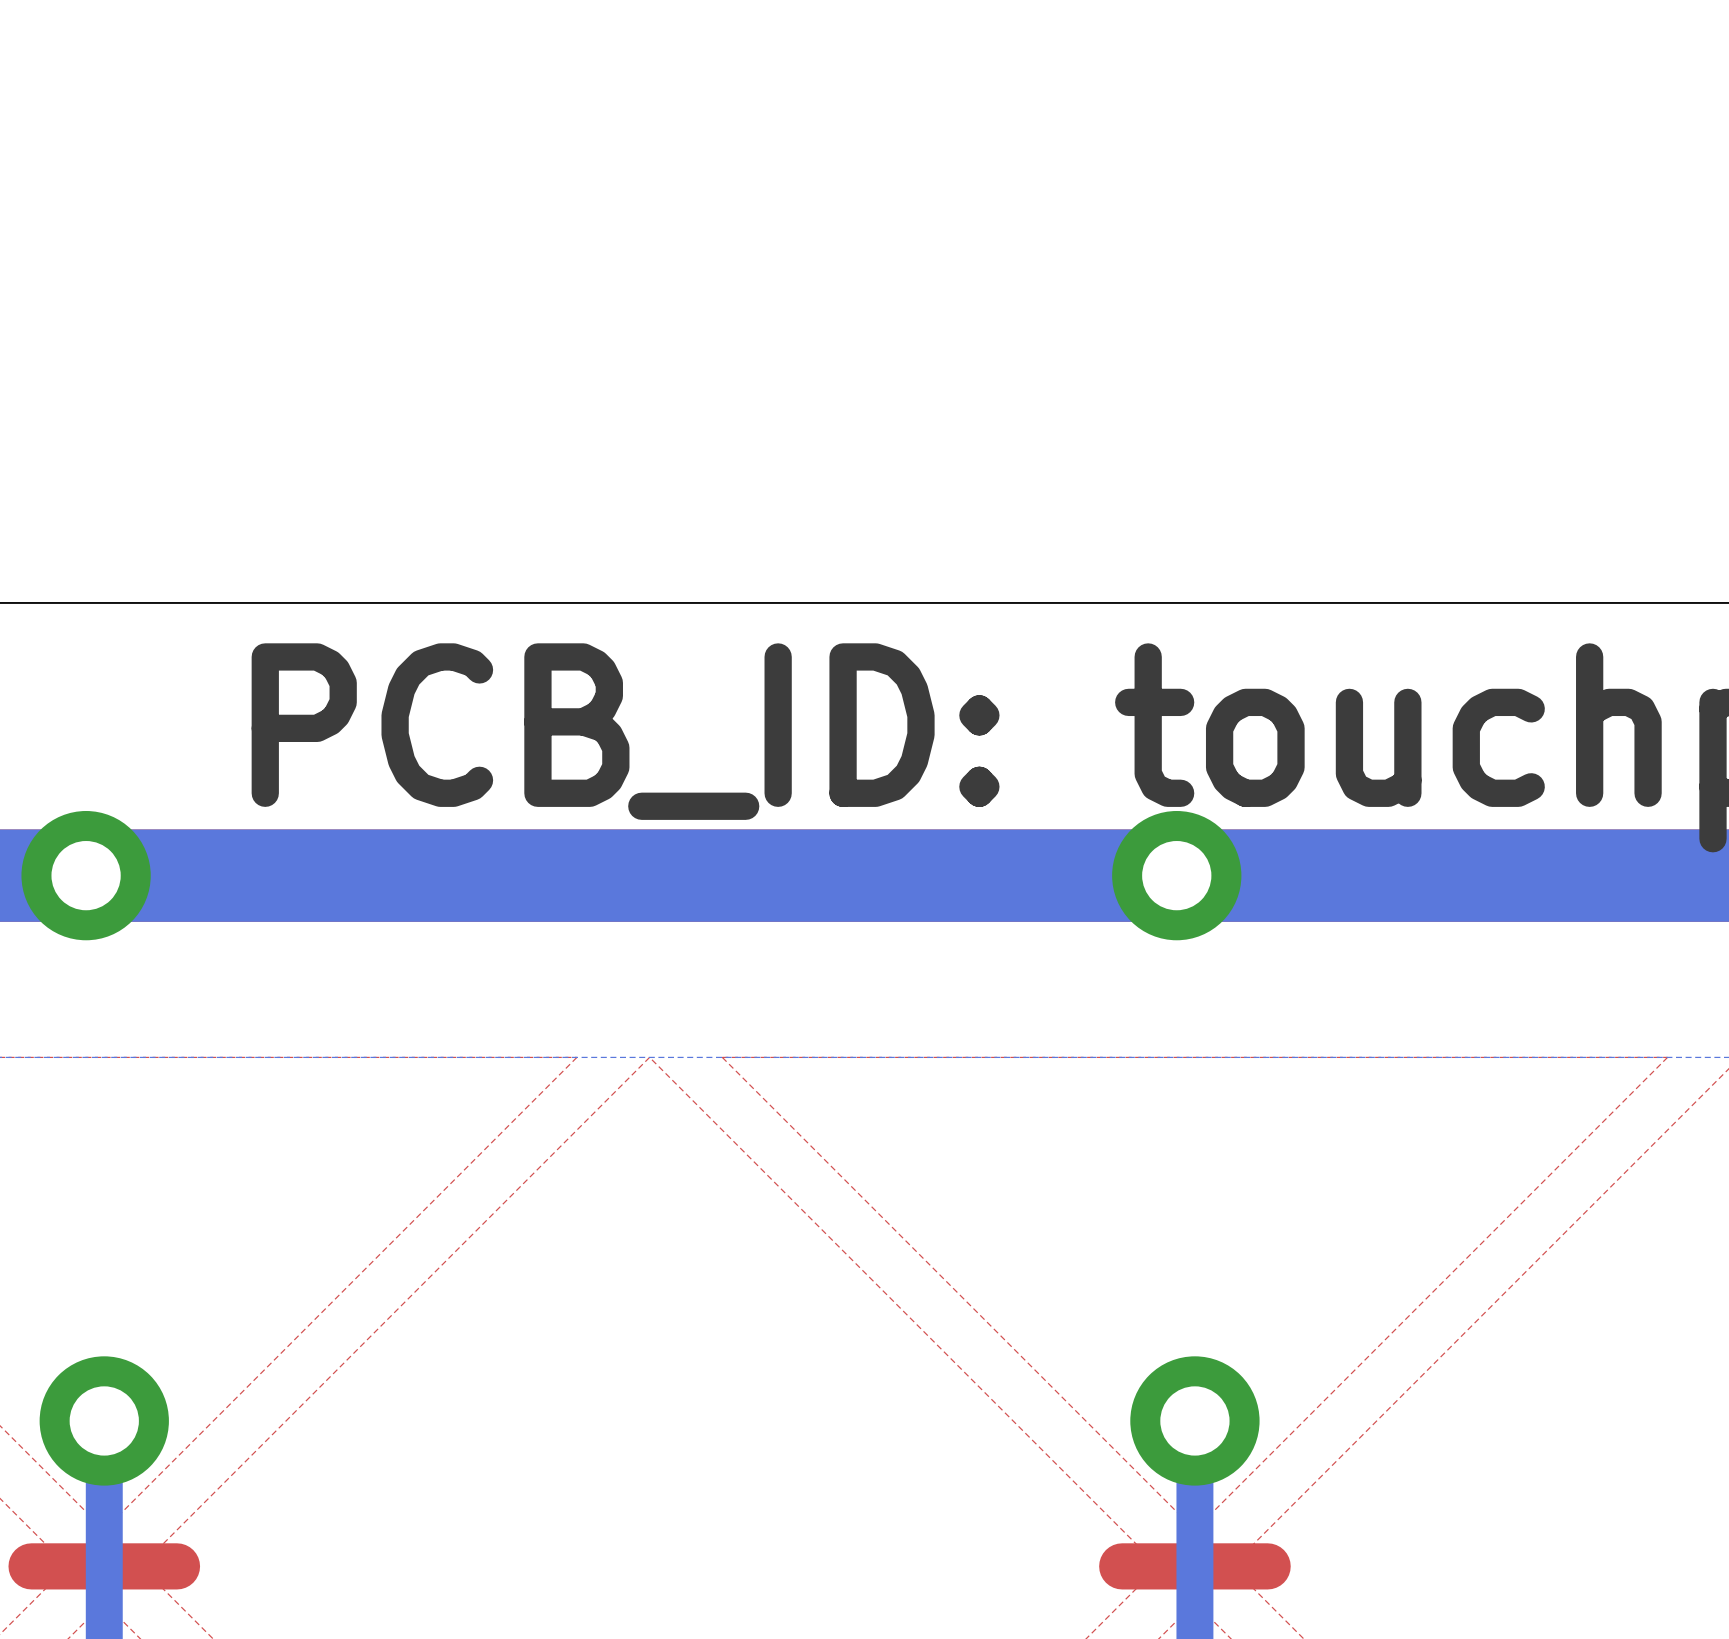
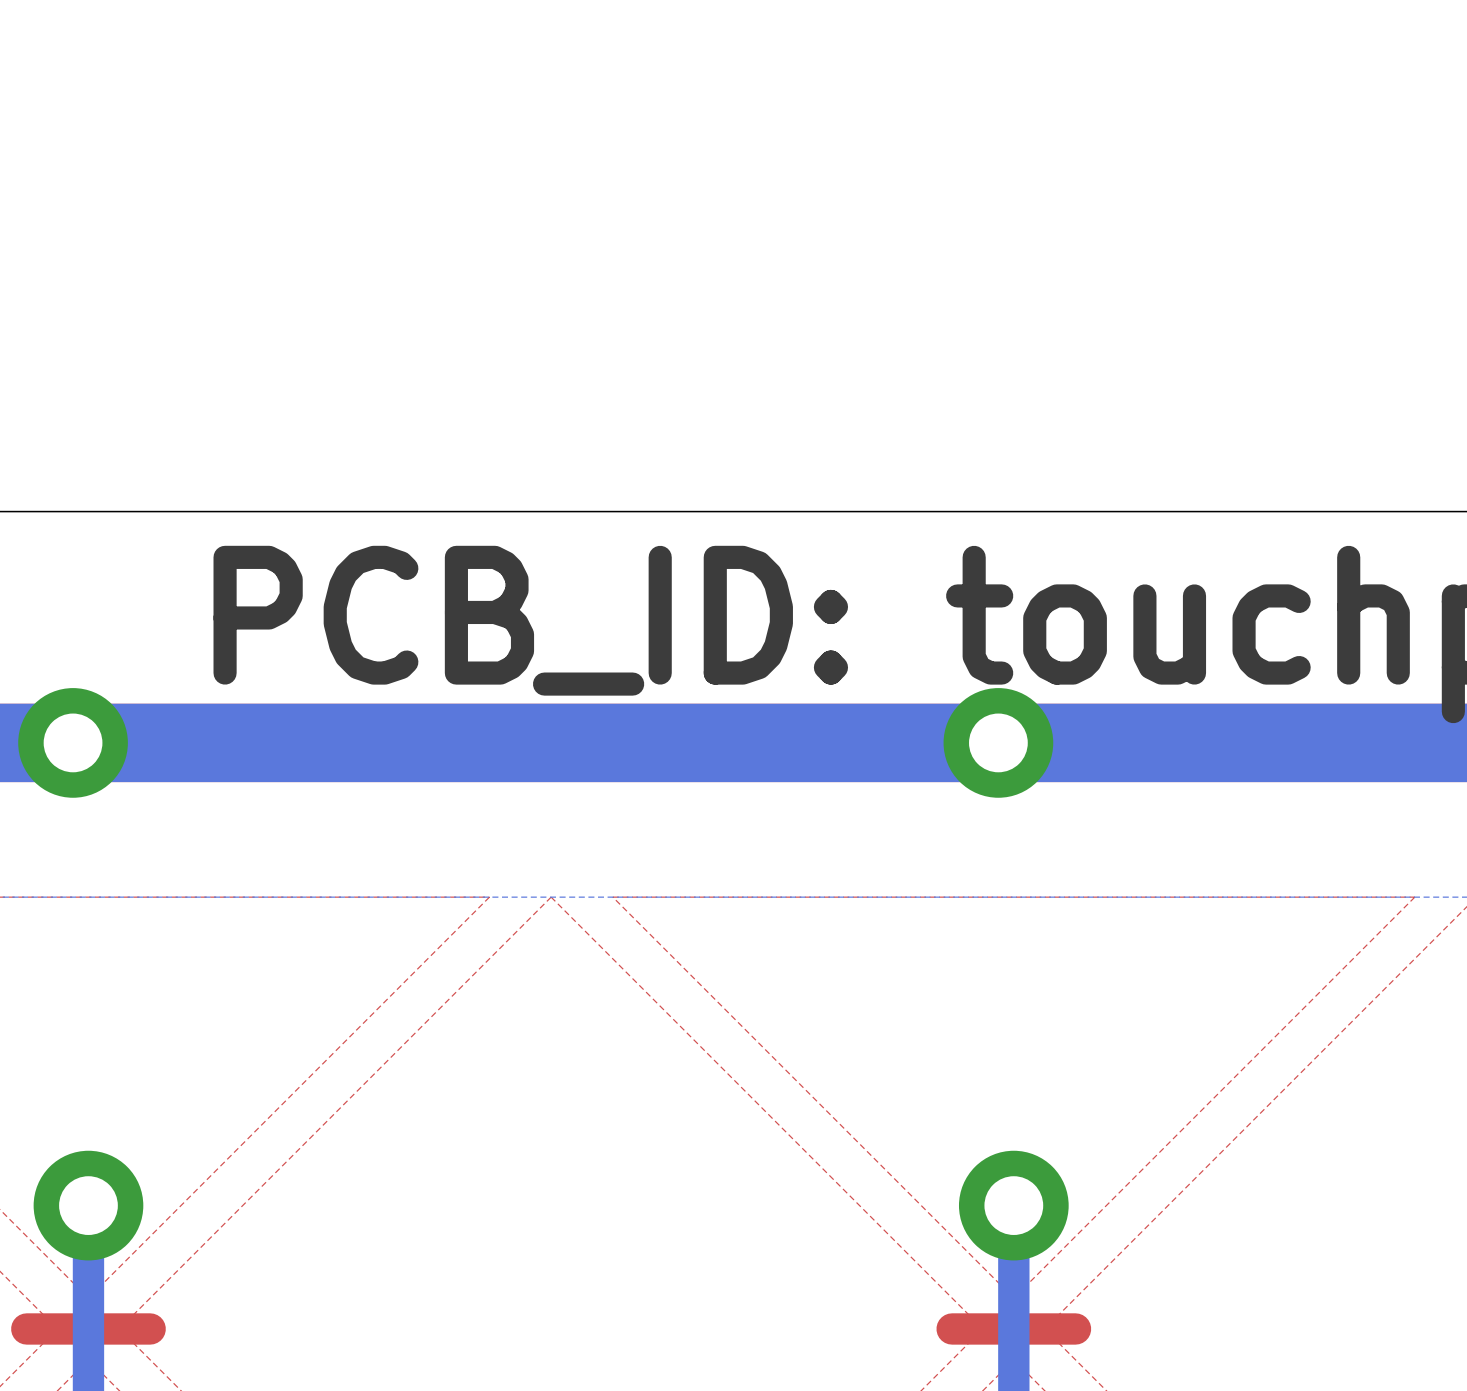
top track width: thick (176, 1566) (31, 1566) -> thin (150, 1328) (26, 1328)
top track width: thick (1267, 1566) (1122, 1566) -> thin (1075, 1328) (952, 1328)

